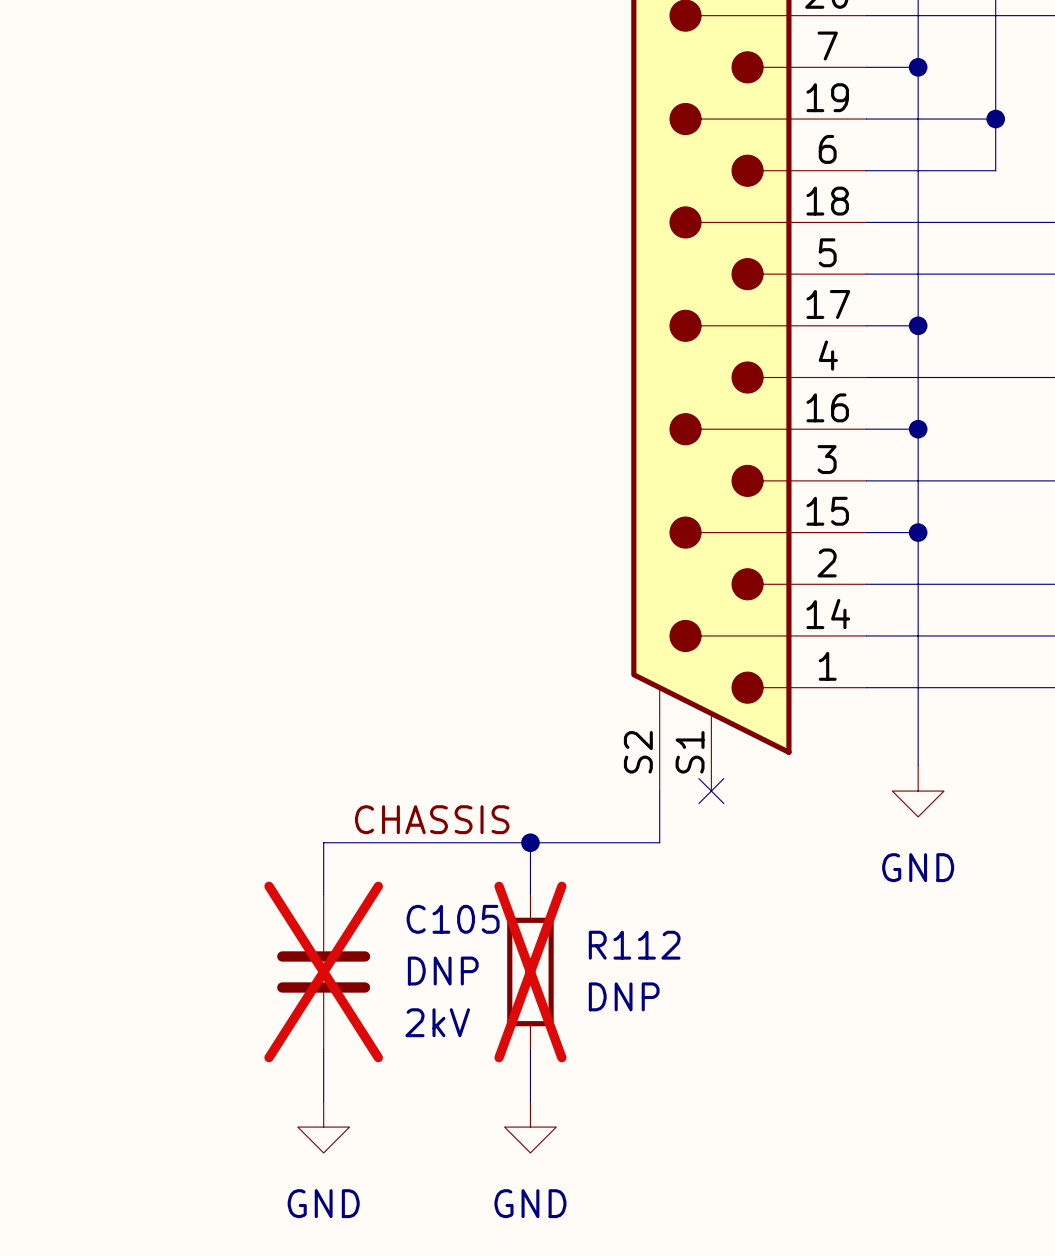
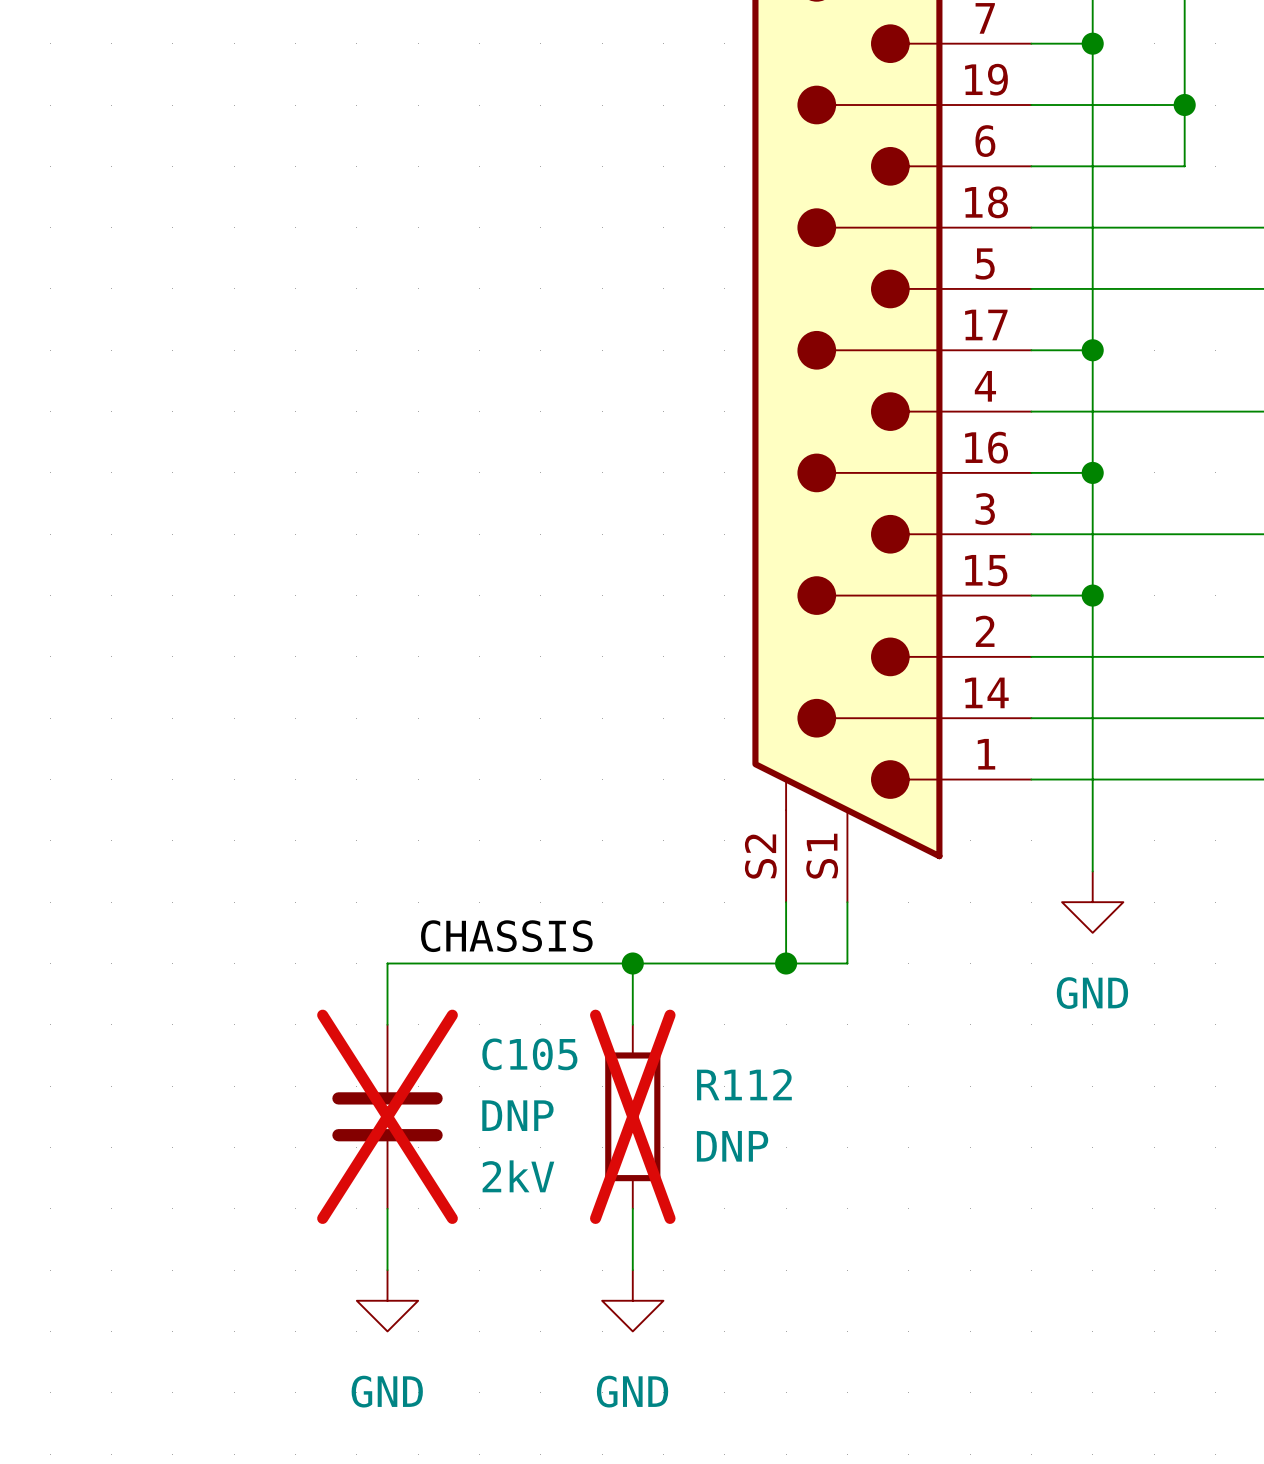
wire: none -> (847, 902) (847, 963) (786, 963)
no-connect mark: (711, 791) -> none
junction: none -> (786, 963)

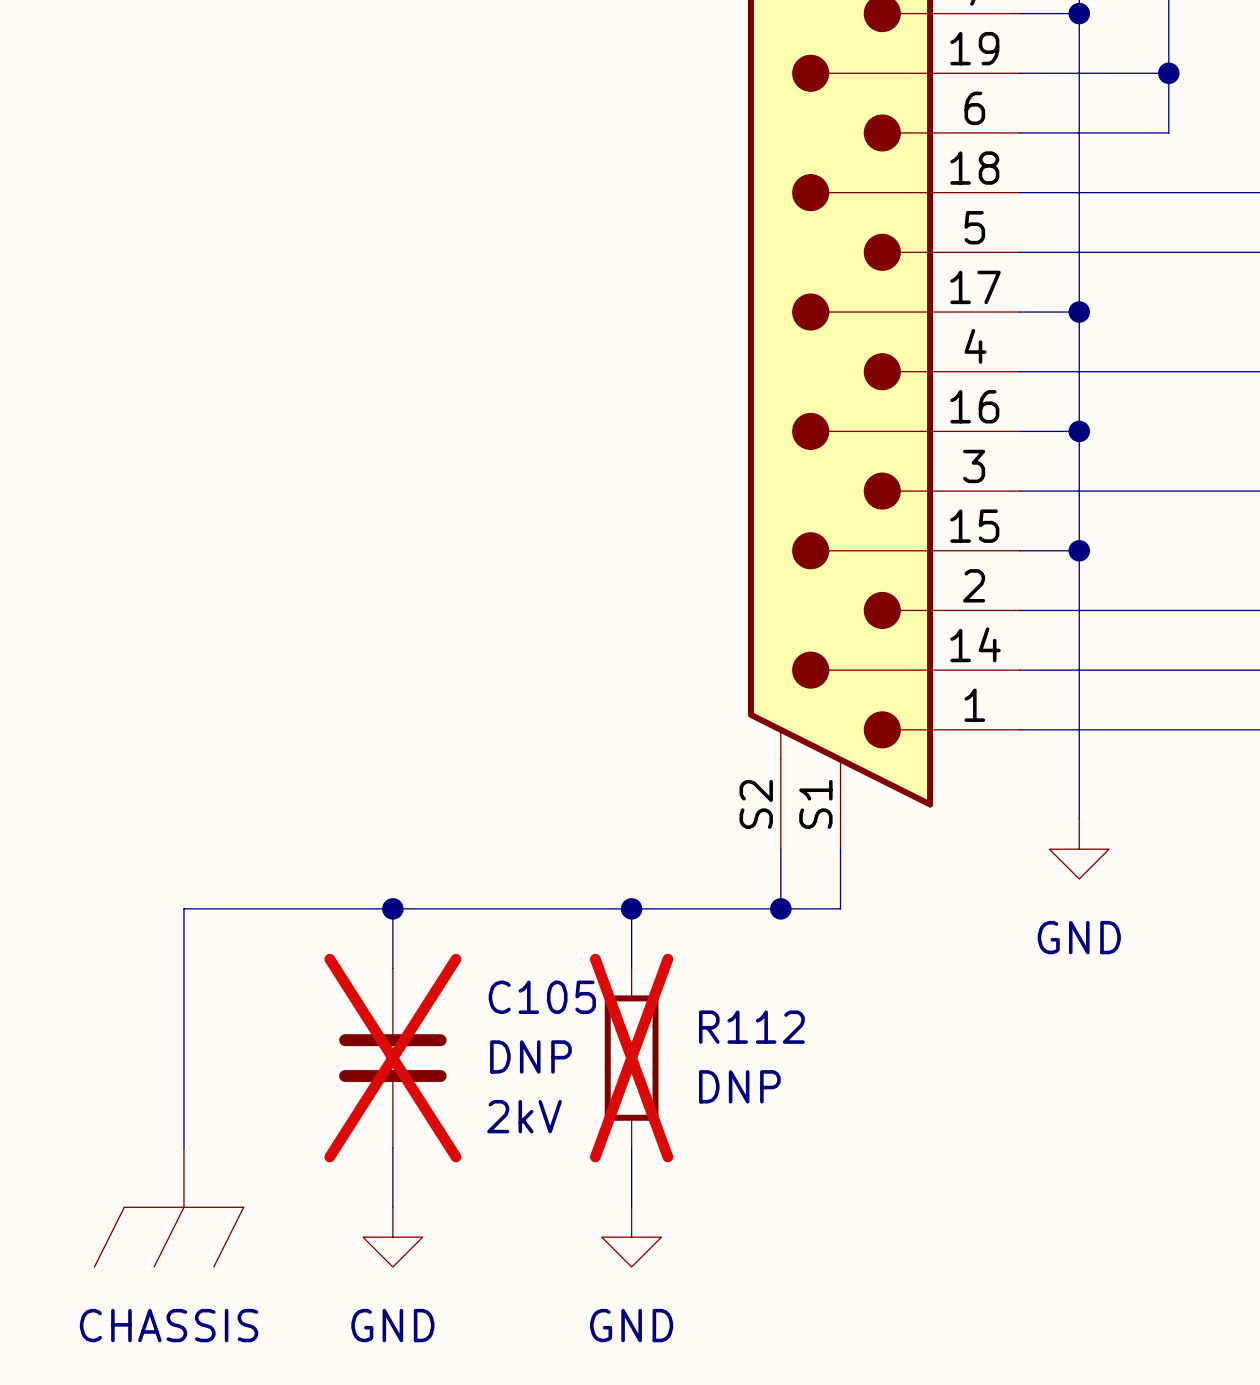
label: CHASSIS (506, 936) -> none
wire: none -> (392, 908) (183, 908) (183, 1147)
junction: none -> (392, 908)
power symbol: none -> CHASSIS (169, 1207)

